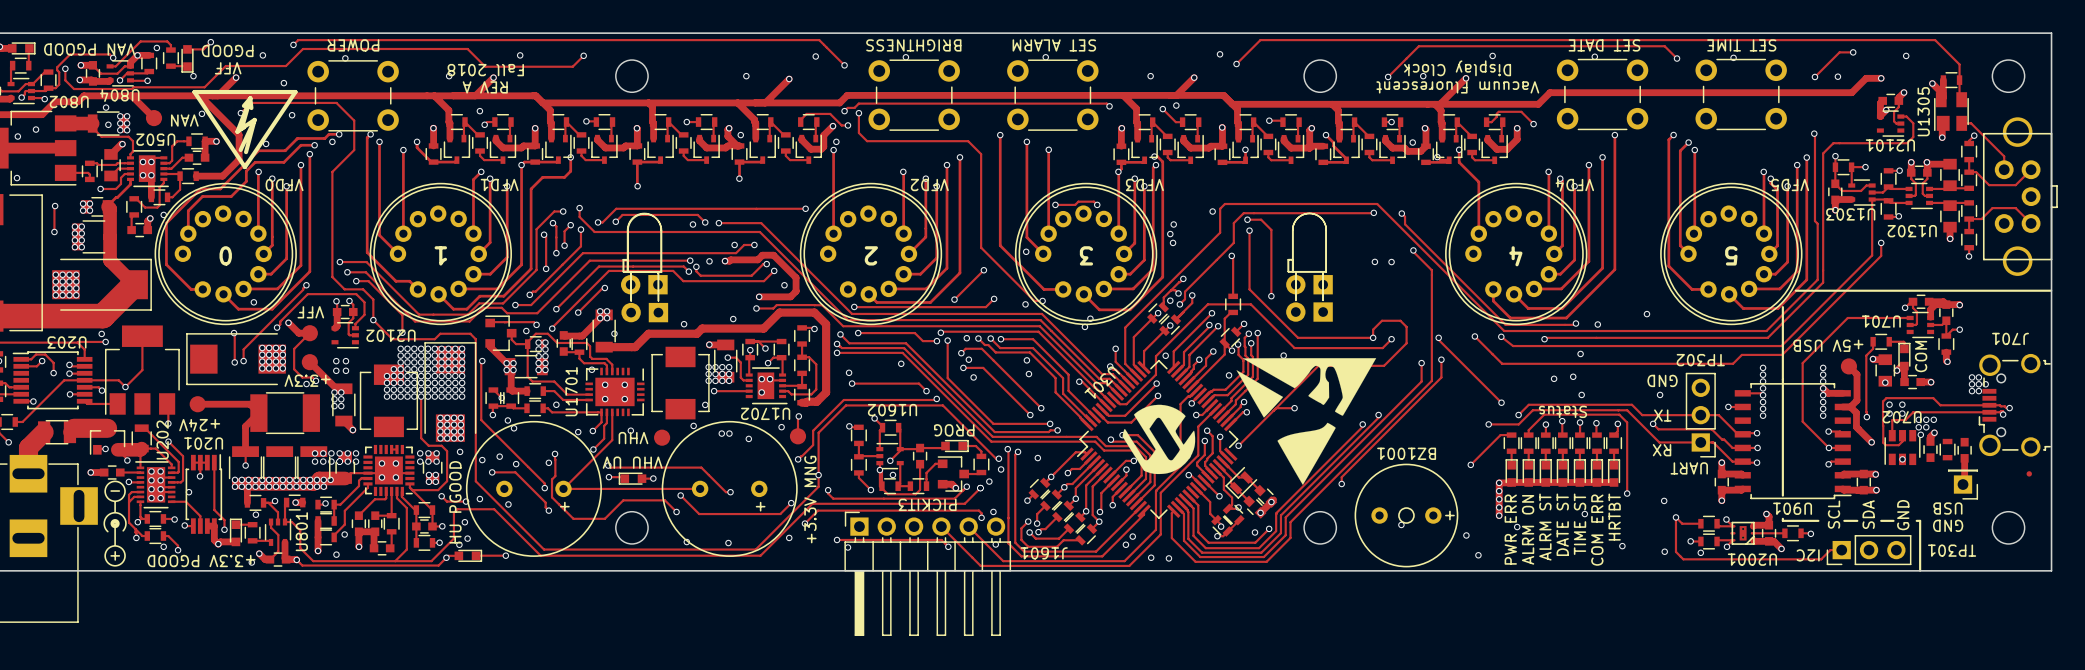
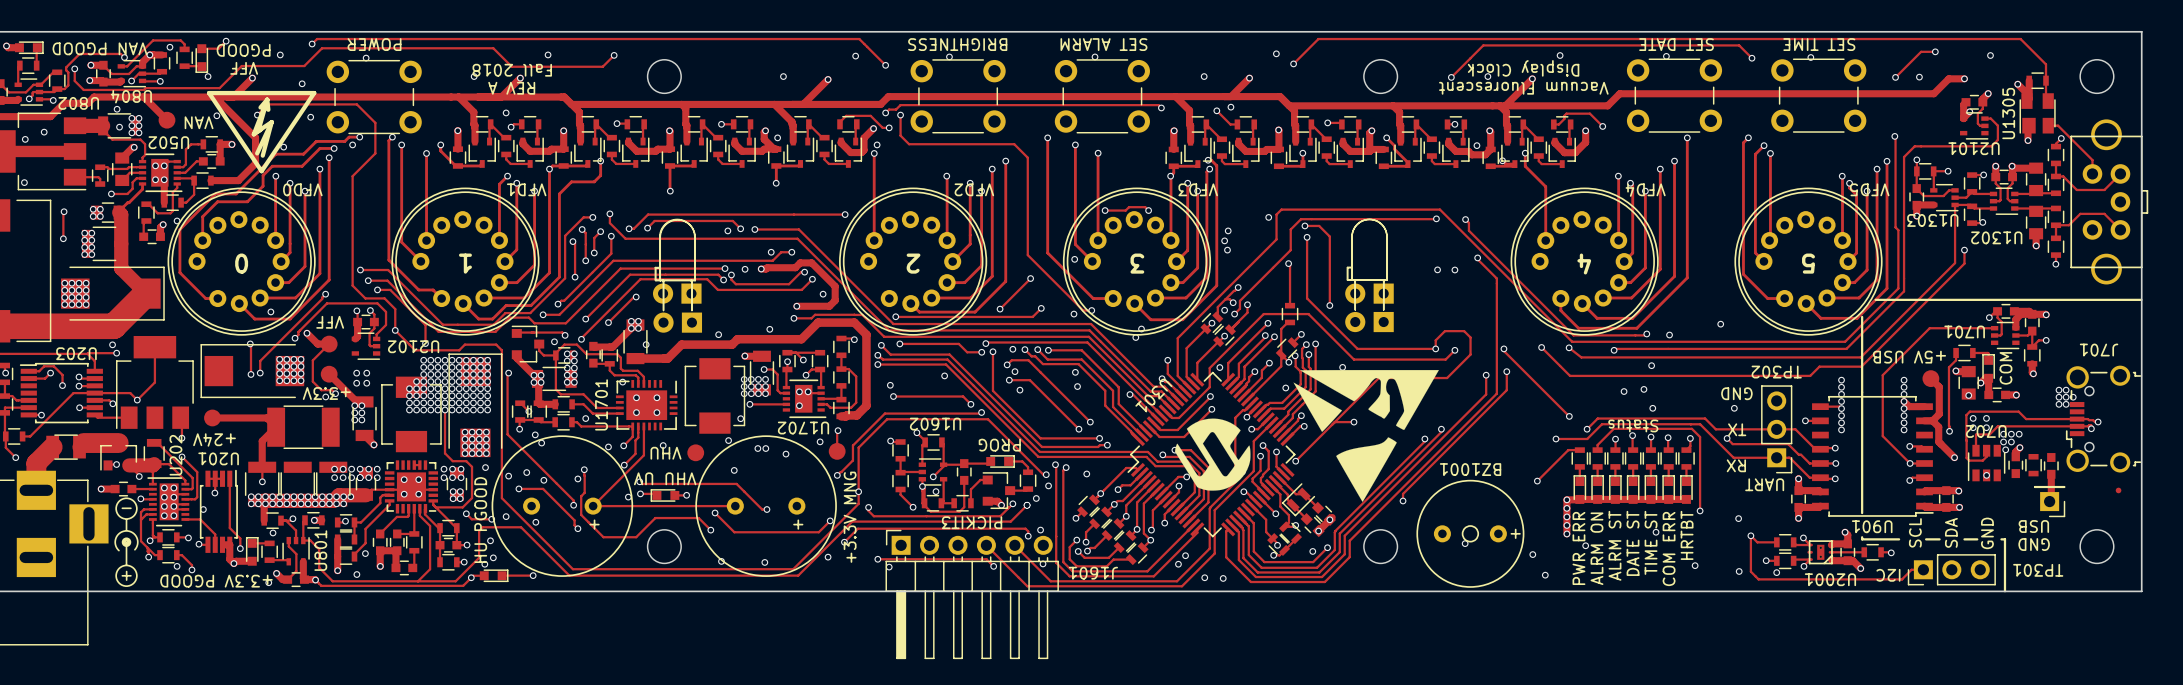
via: none -> (734, 470)
via: none -> (628, 497)

